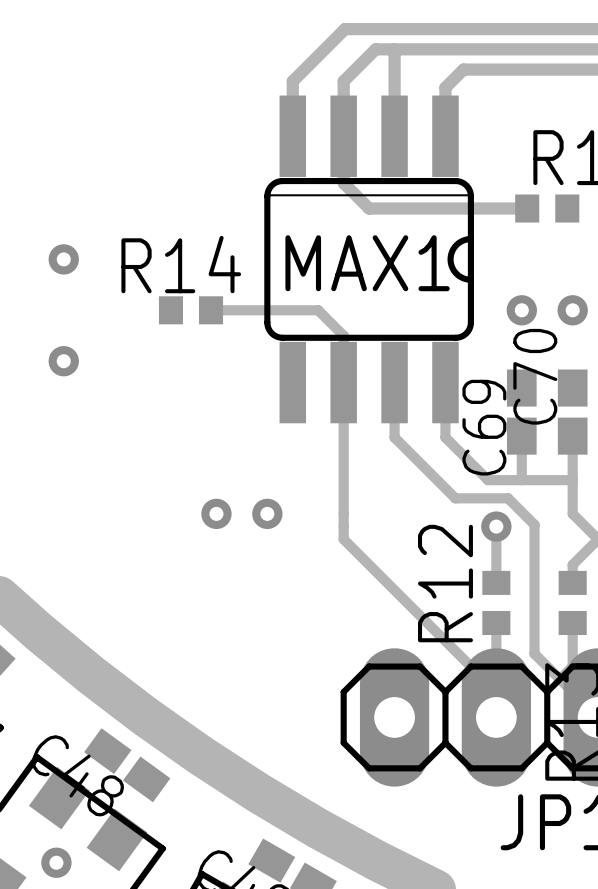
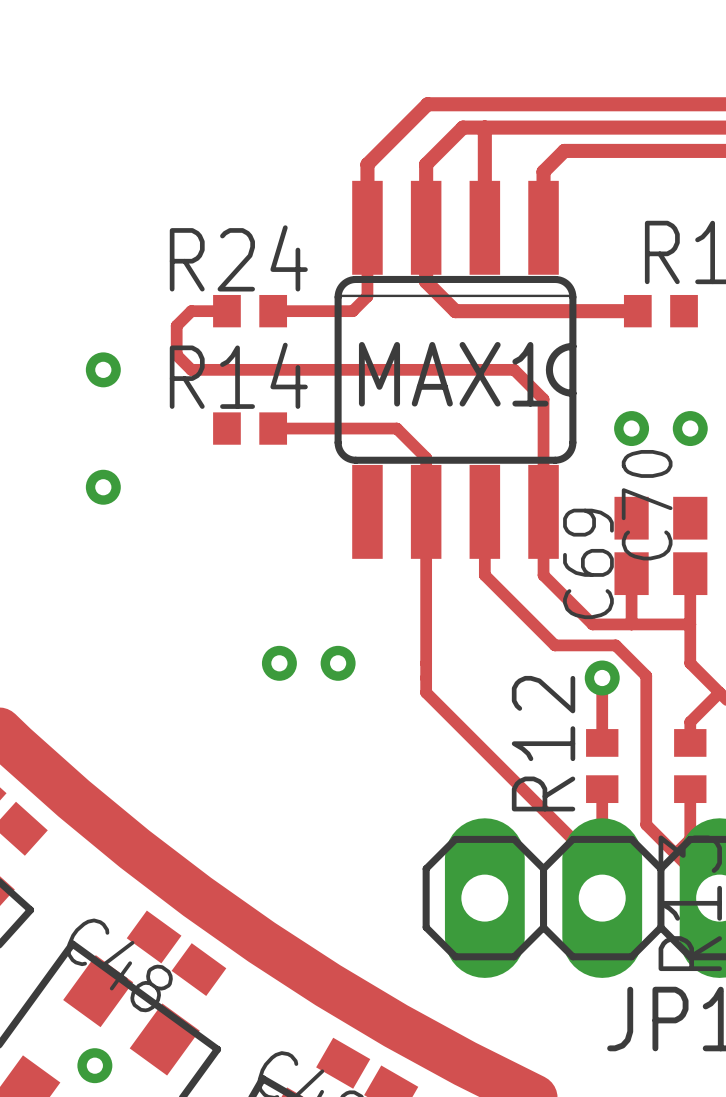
track: none -> (367, 227) (367, 296) (352, 311) (273, 311)
track: none -> (226, 311) (191, 311) (176, 325) (176, 355) (191, 369) (514, 369) (543, 399) (543, 511)
R24: none -> (250, 311)

